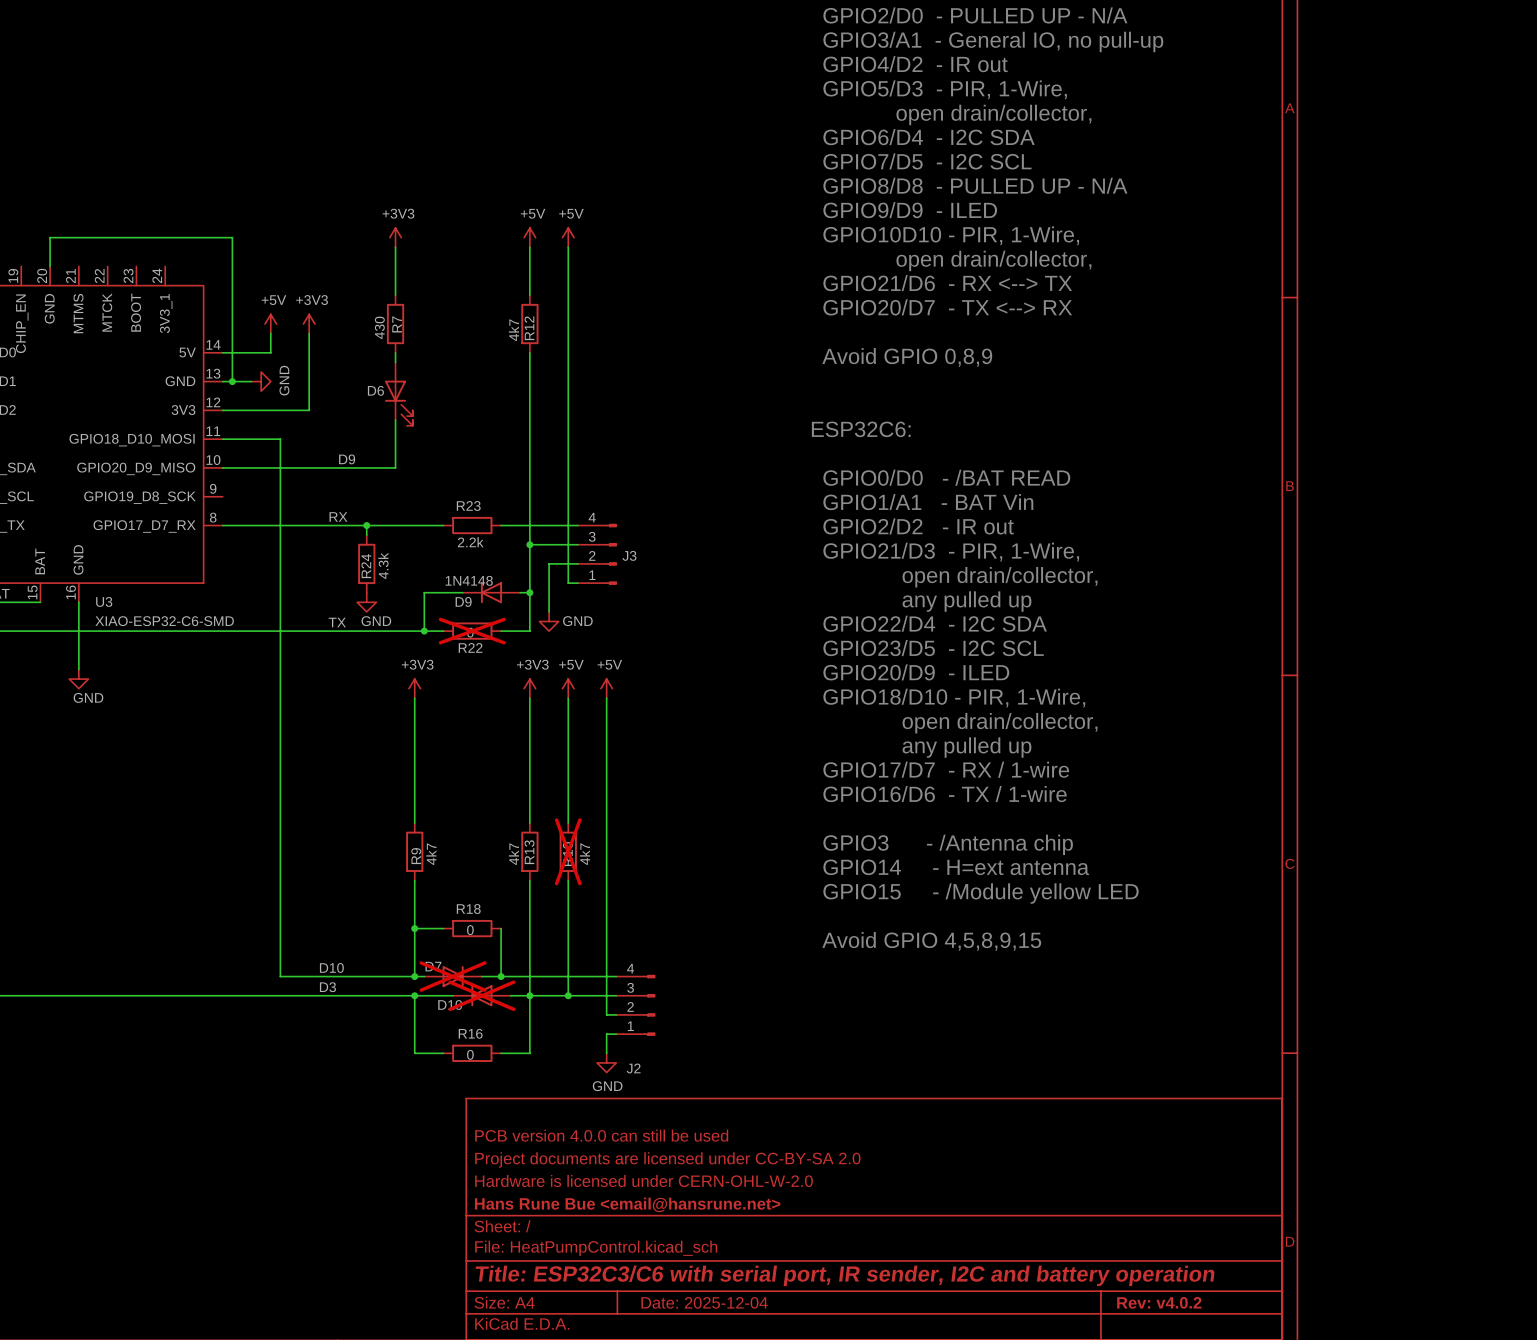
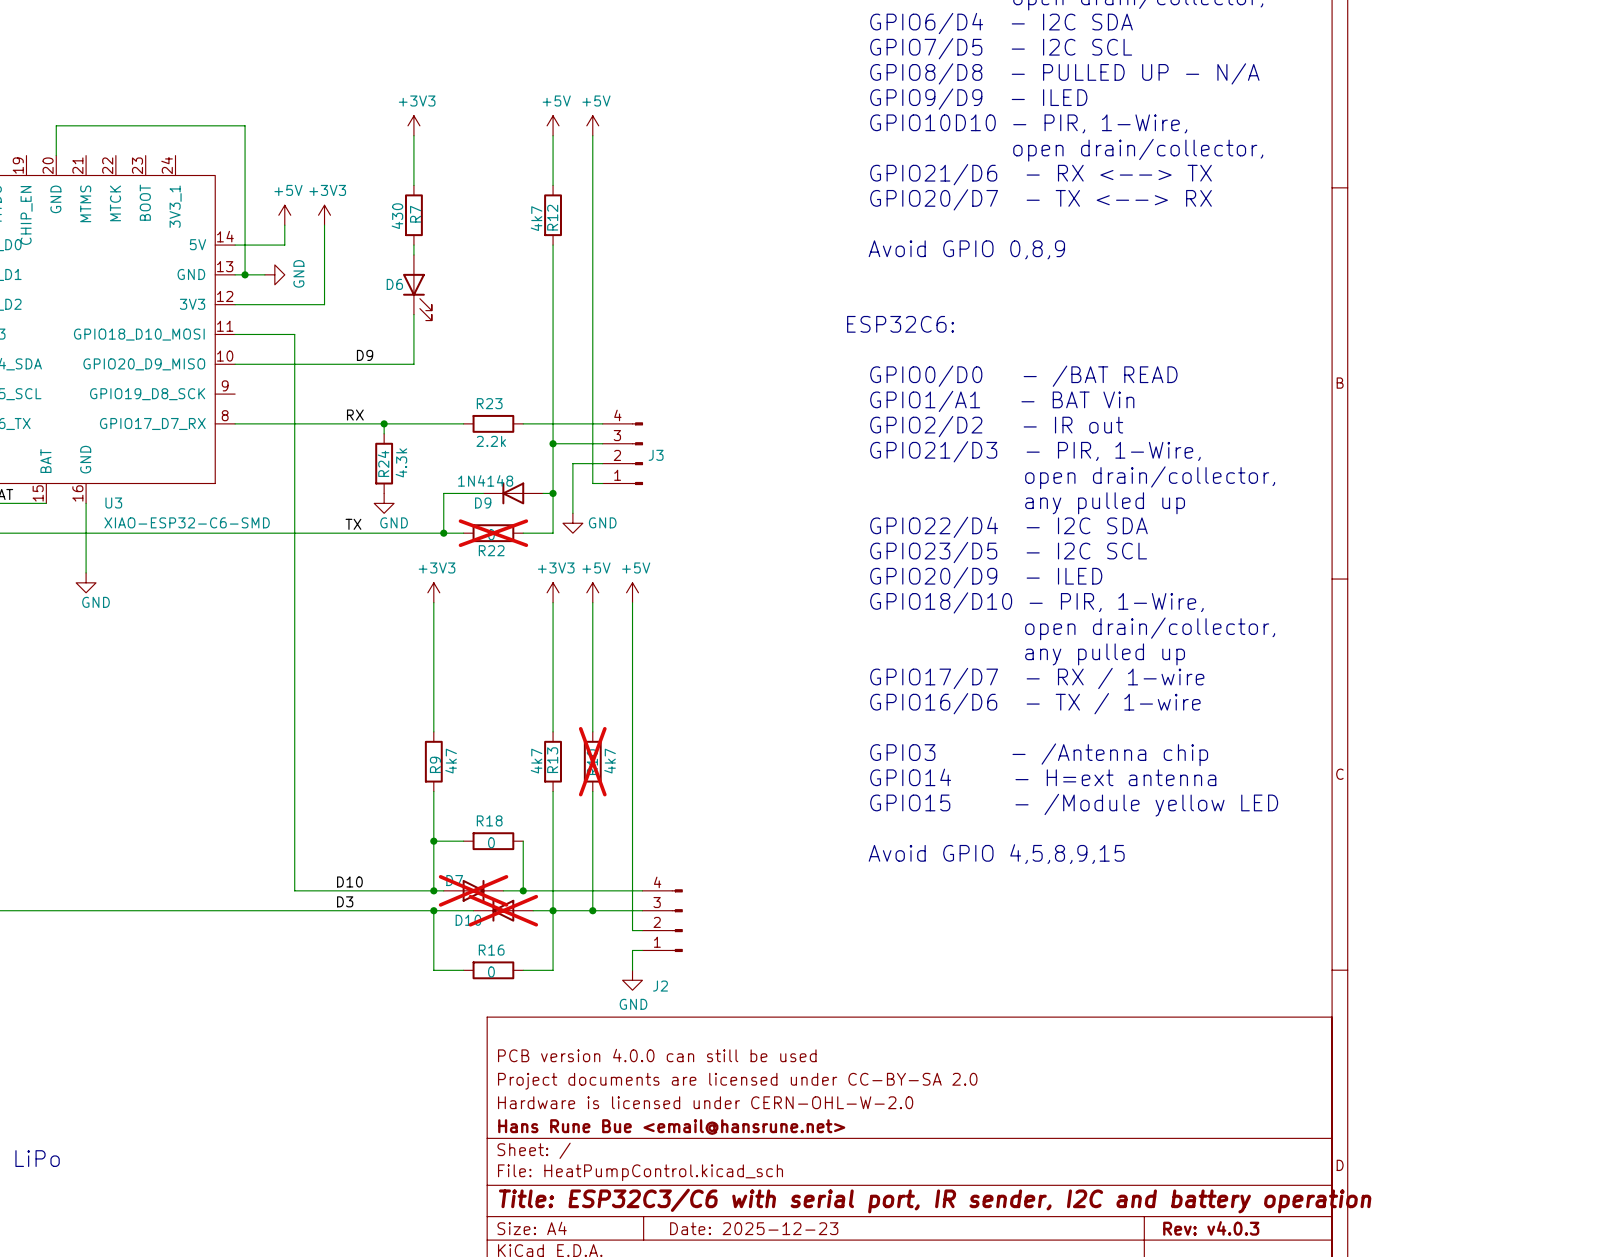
title block: Date: 2025-12-04 (704, 1302) -> Date: 2025-12-23 (754, 1228)
title block: Rev: v4.0.2 (1159, 1302) -> Rev: v4.0.3 (1211, 1228)

